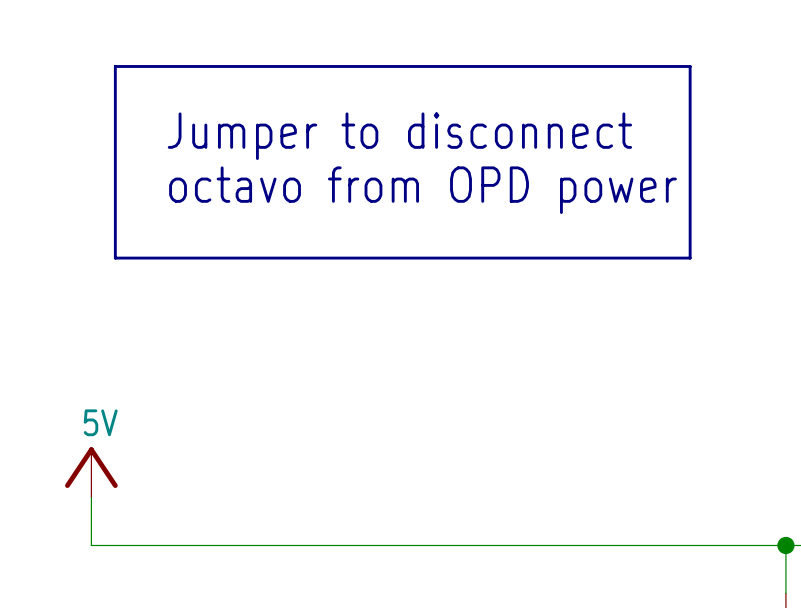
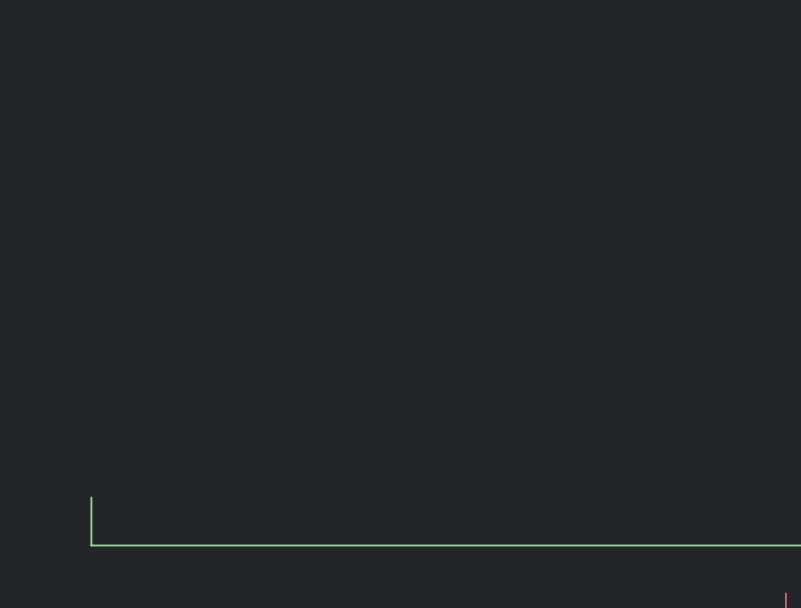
line: (115, 66) (690, 66) (690, 258) (115, 258) (115, 66) -> none
text: Jumper to disconnect (399, 136) -> none
text: octavo from OPD power (422, 190) -> none
power symbol: 5V (91, 472) -> none
wire: (785, 545) (785, 593) -> none
junction: (785, 545) -> none

